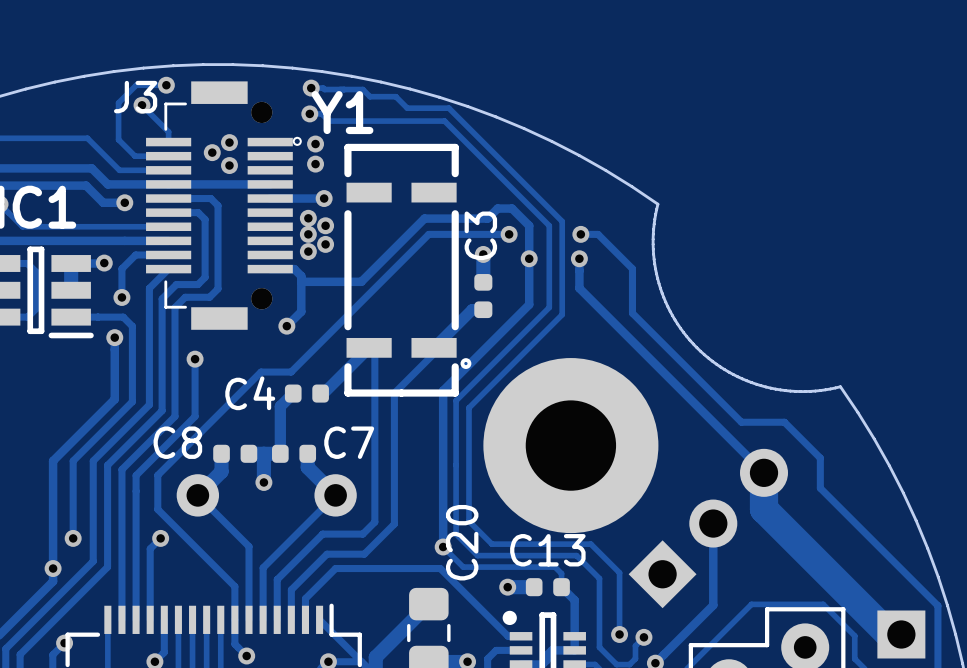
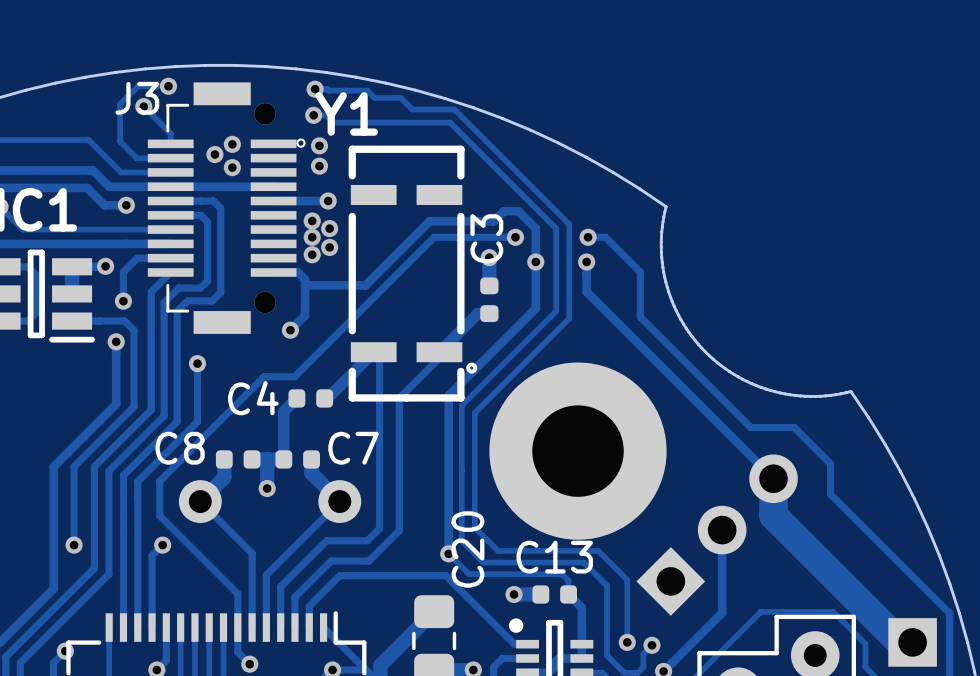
via: (53, 568) -> none

